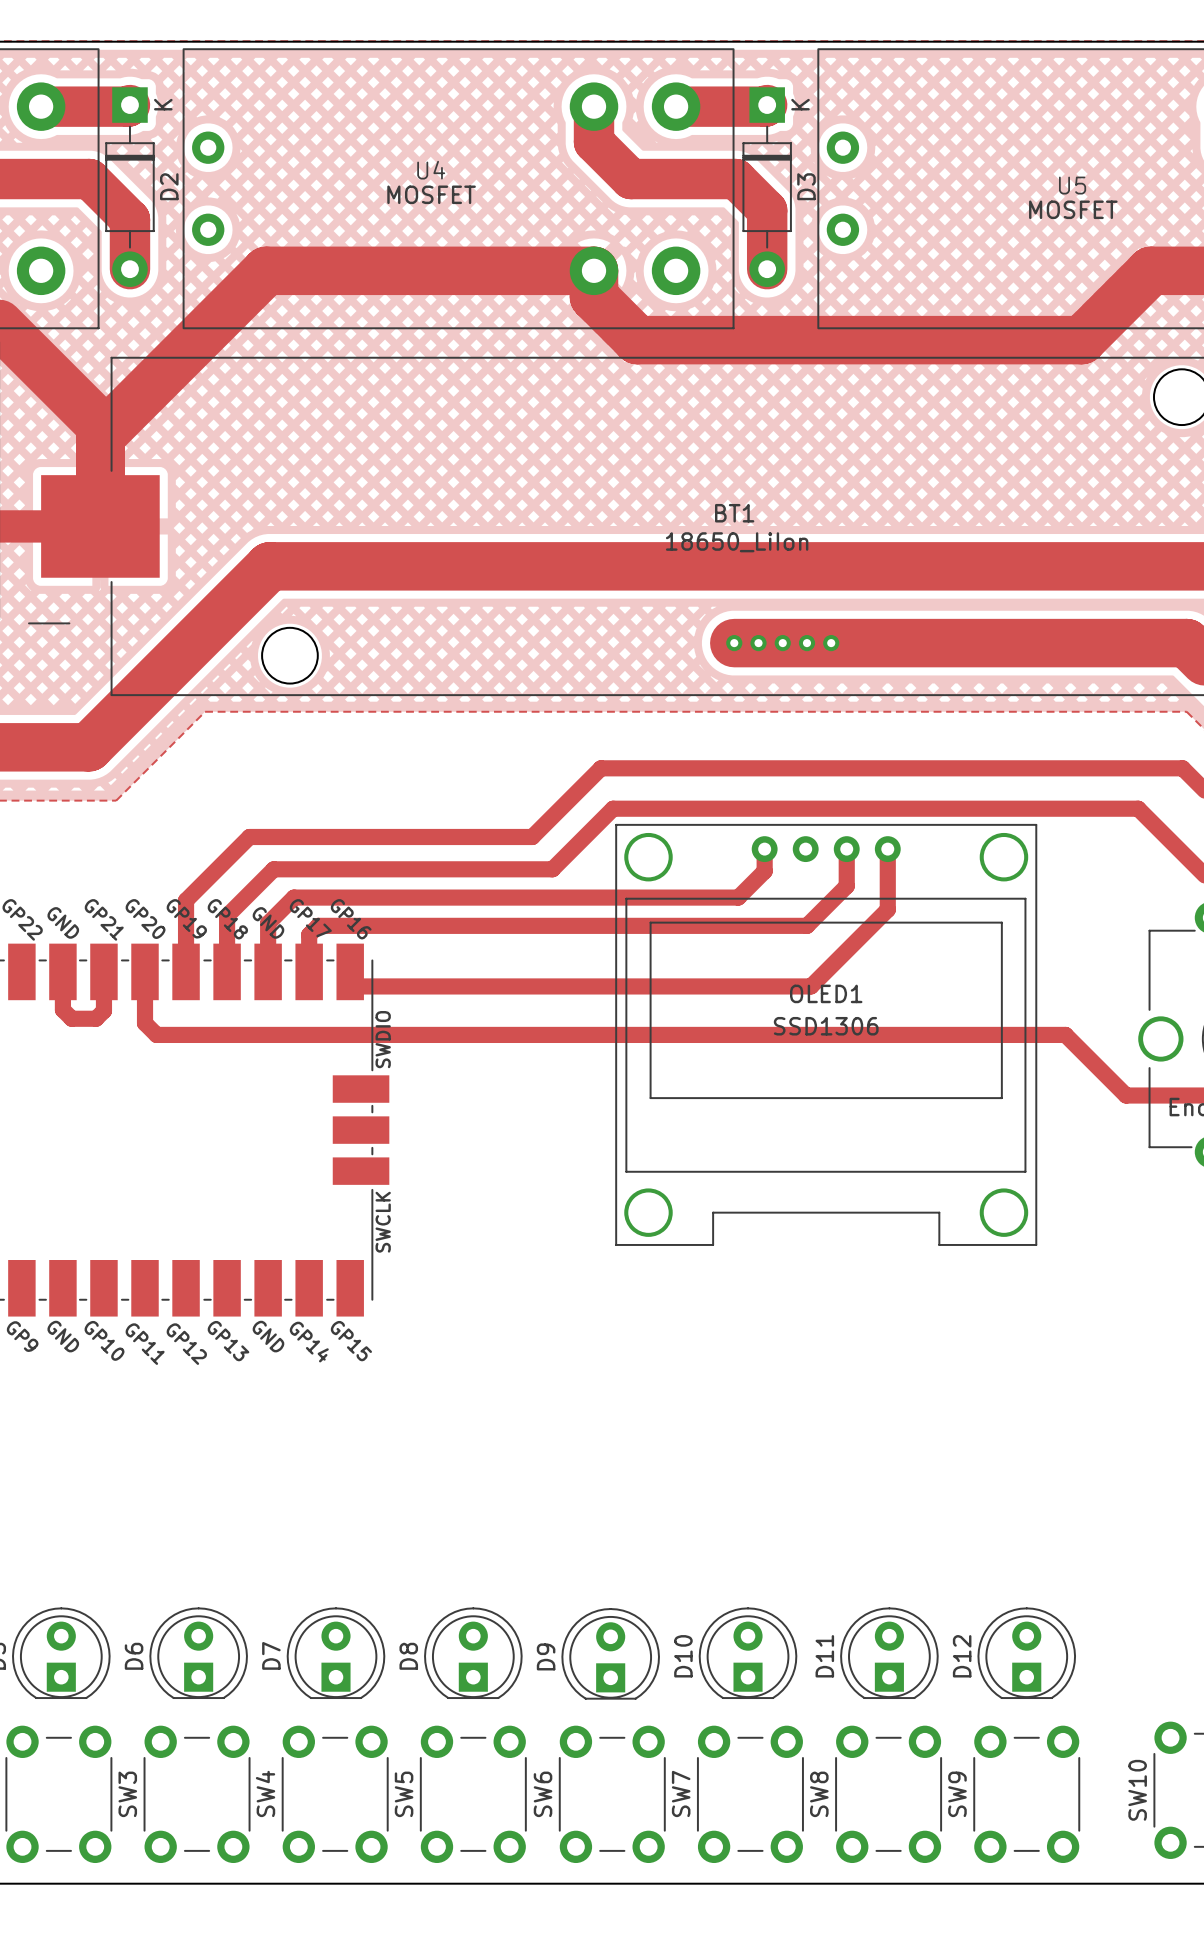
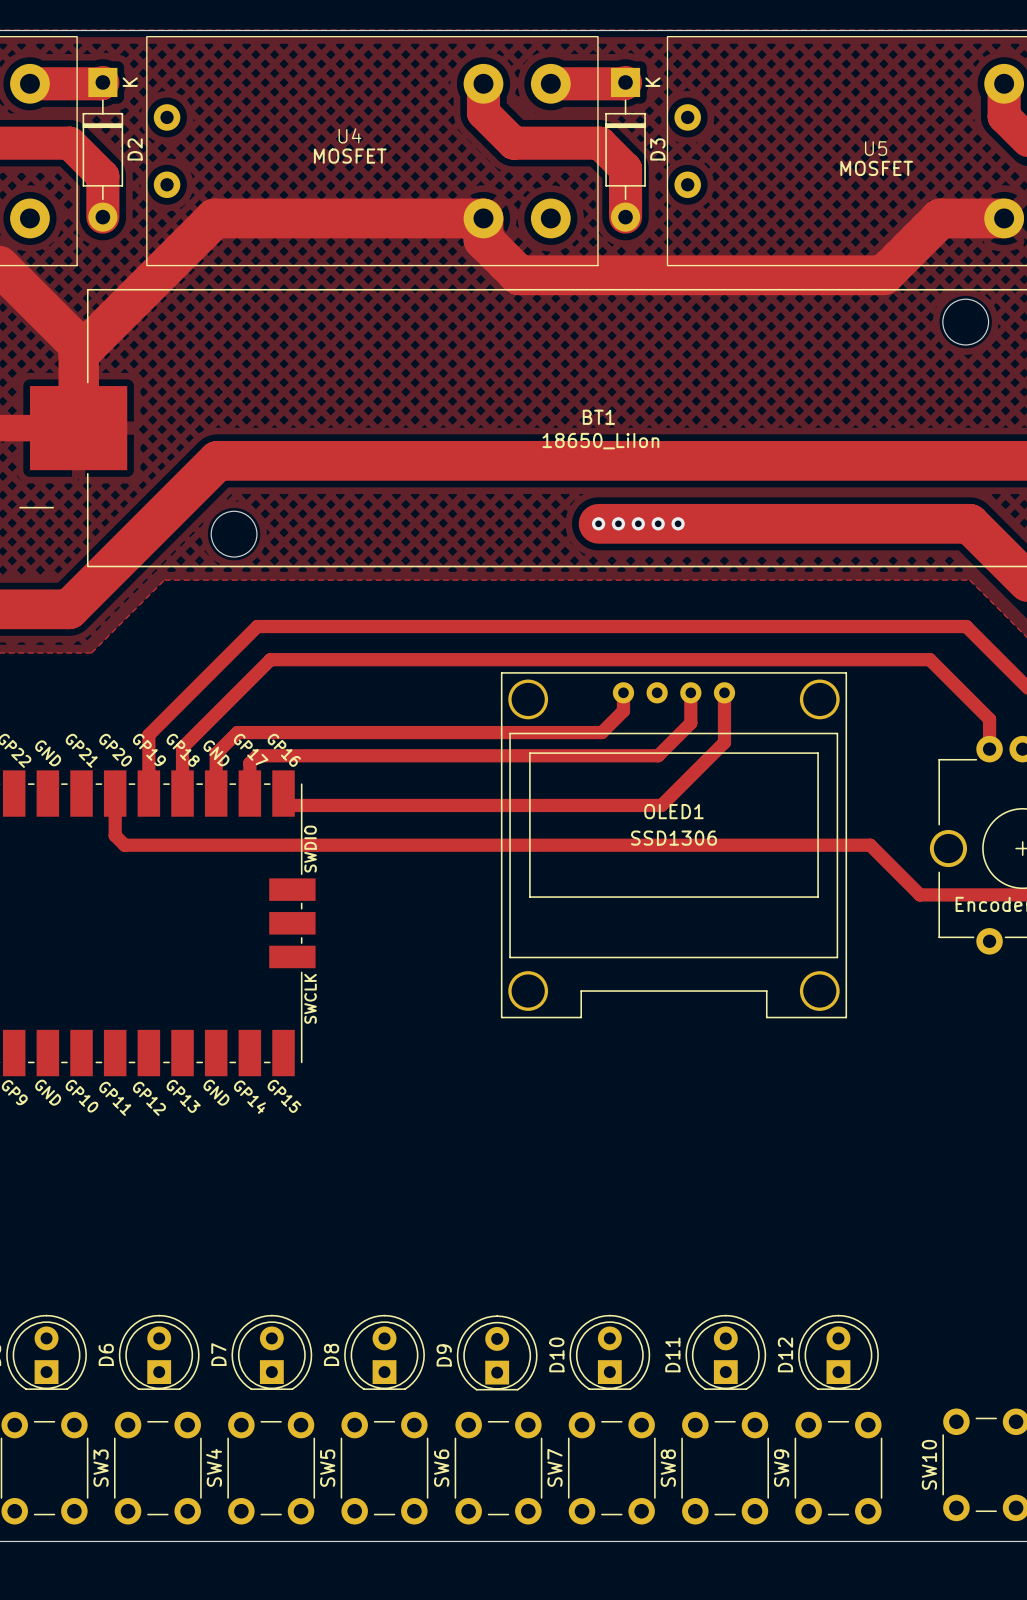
track: (600, 768) (532, 836) (249, 836) -> (489, 626) (257, 626) (200, 682)
track: (613, 808) (552, 869) (273, 869) -> (499, 659) (270, 659) (220, 709)
track: (62, 986) (62, 1009) (71, 1018) (96, 1018) (103, 1010) (103, 986) -> none

